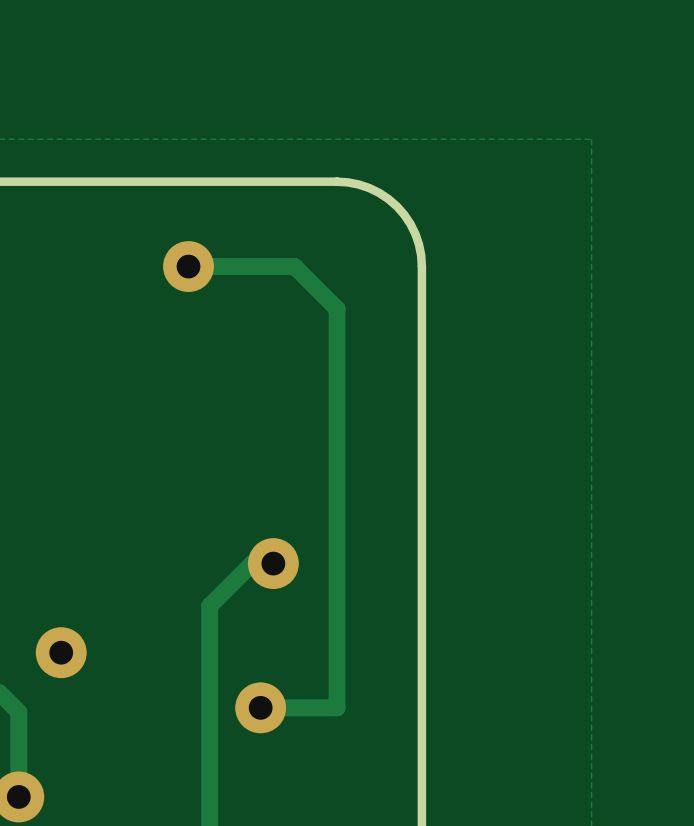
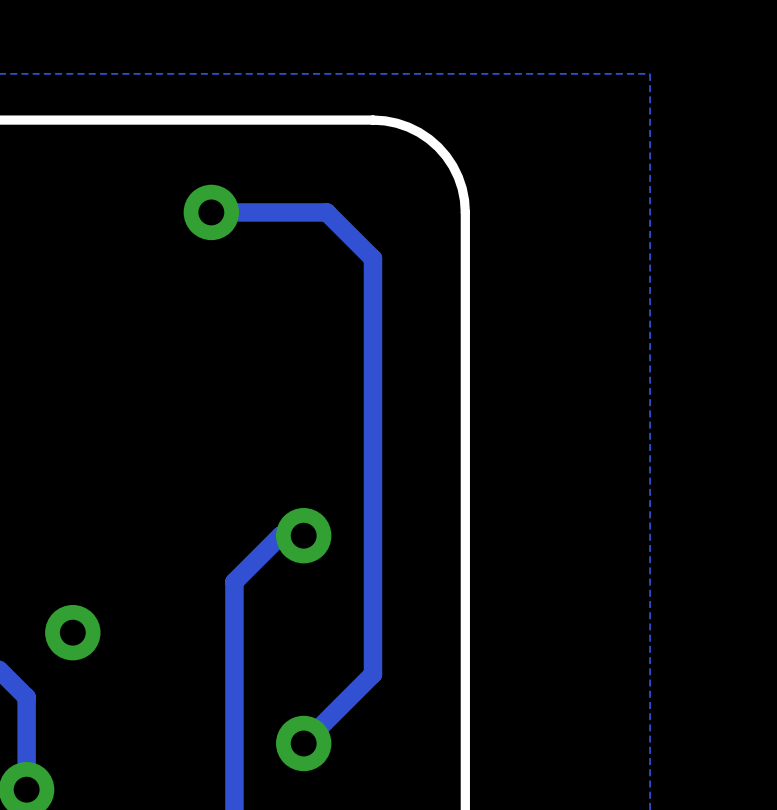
track: (337, 690) (337, 707) (260, 707) -> (372, 674) (303, 743)
via position: (260, 707) -> (303, 743)

